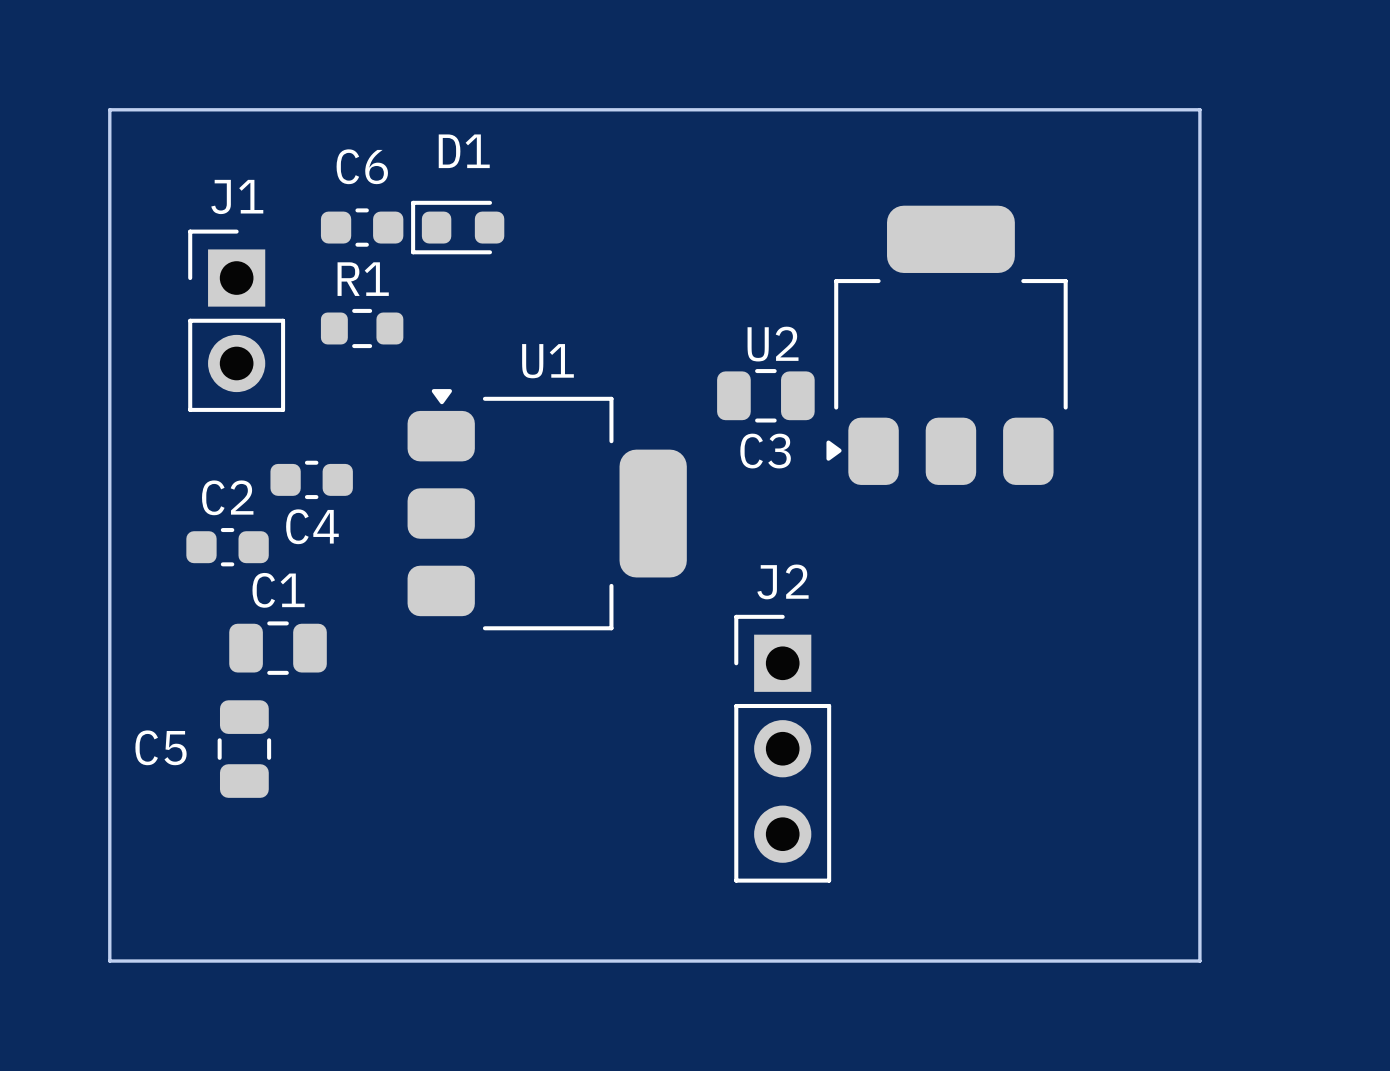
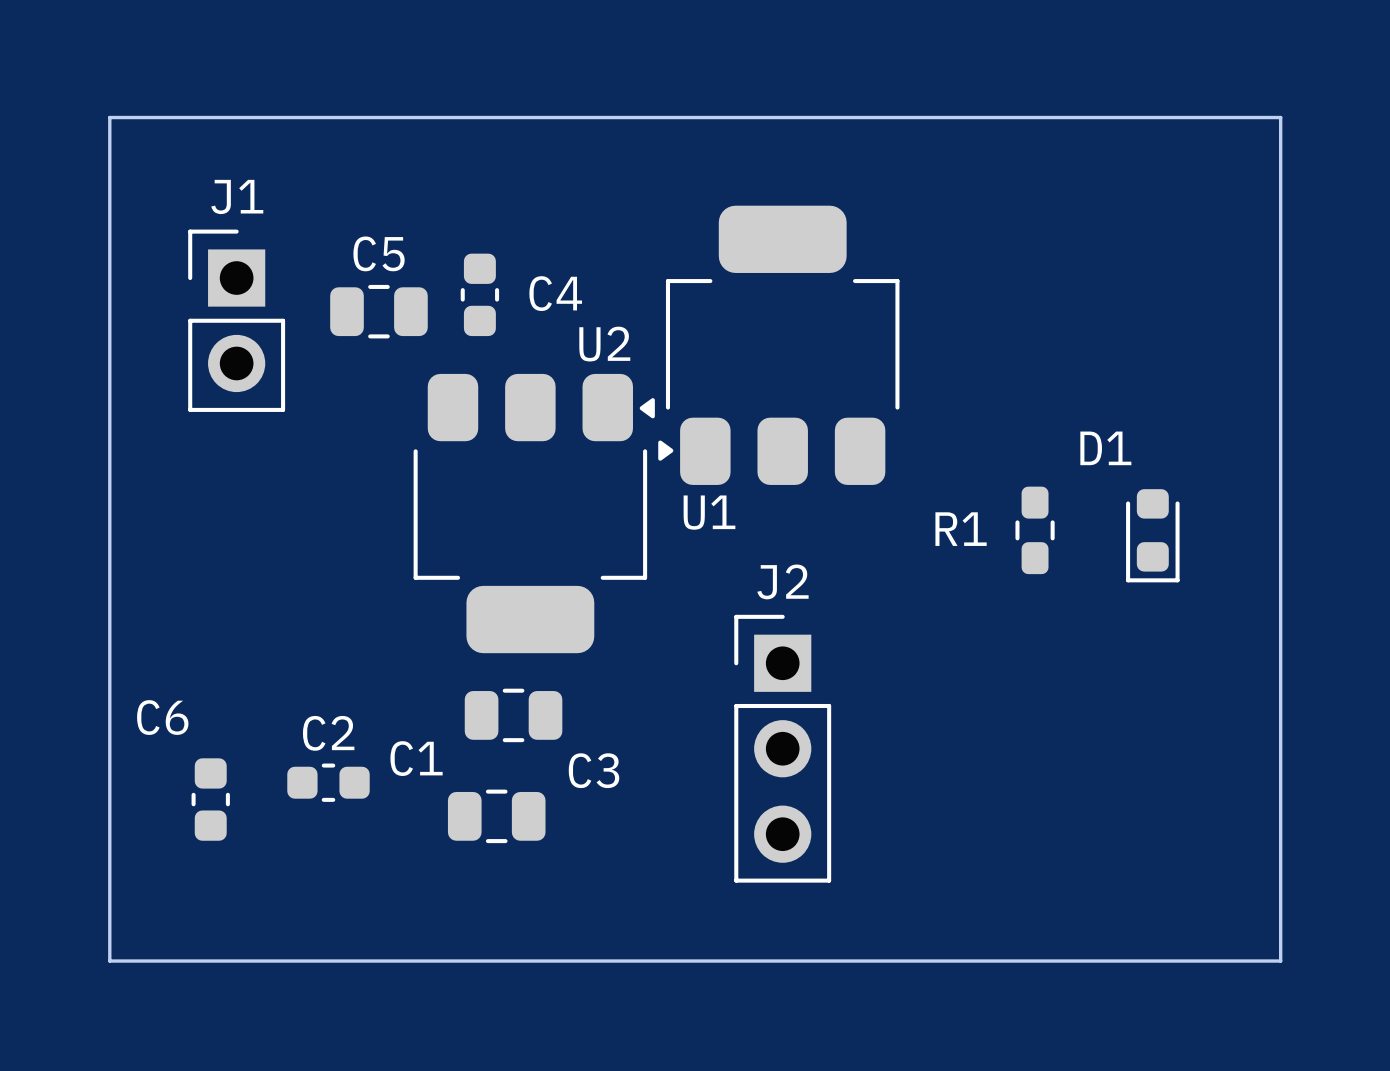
board edge: (109, 117) (109, 109) (1199, 109) (1199, 961) -> (109, 117) (1280, 117) (1280, 961) (1199, 961)
C6 rotation: 0° (362, 227) -> 90° clockwise (210, 799)
C6 position: (362, 227) -> (210, 799)
D1 rotation: 0° (457, 227) -> 90° counterclockwise (1152, 535)
D1 position: (457, 227) -> (1152, 535)
R1 name position: R1 (363, 279) -> R1 (961, 529)
R1 footprint: [320, 308, 404, 349] -> [1015, 486, 1055, 575]
U2 position: (947, 345) -> (778, 345)
C3 position: (765, 395) -> (513, 715)
C3 name position: C3 (765, 451) -> C3 (594, 770)
C4 rotation: 0° (311, 479) -> 90° clockwise (479, 294)
C4 position: (311, 479) -> (479, 294)
U1 rotation: 0° (547, 509) -> 90° clockwise (534, 513)
C4 name position: C4 (312, 526) -> C4 (555, 293)
C2 position: (227, 547) -> (328, 782)
C1 name position: C1 (278, 590) -> C1 (416, 758)
C1 position: (278, 648) -> (496, 816)
C5 rotation: 0° (244, 749) -> 90° clockwise (378, 311)
C5 position: (244, 749) -> (378, 311)

